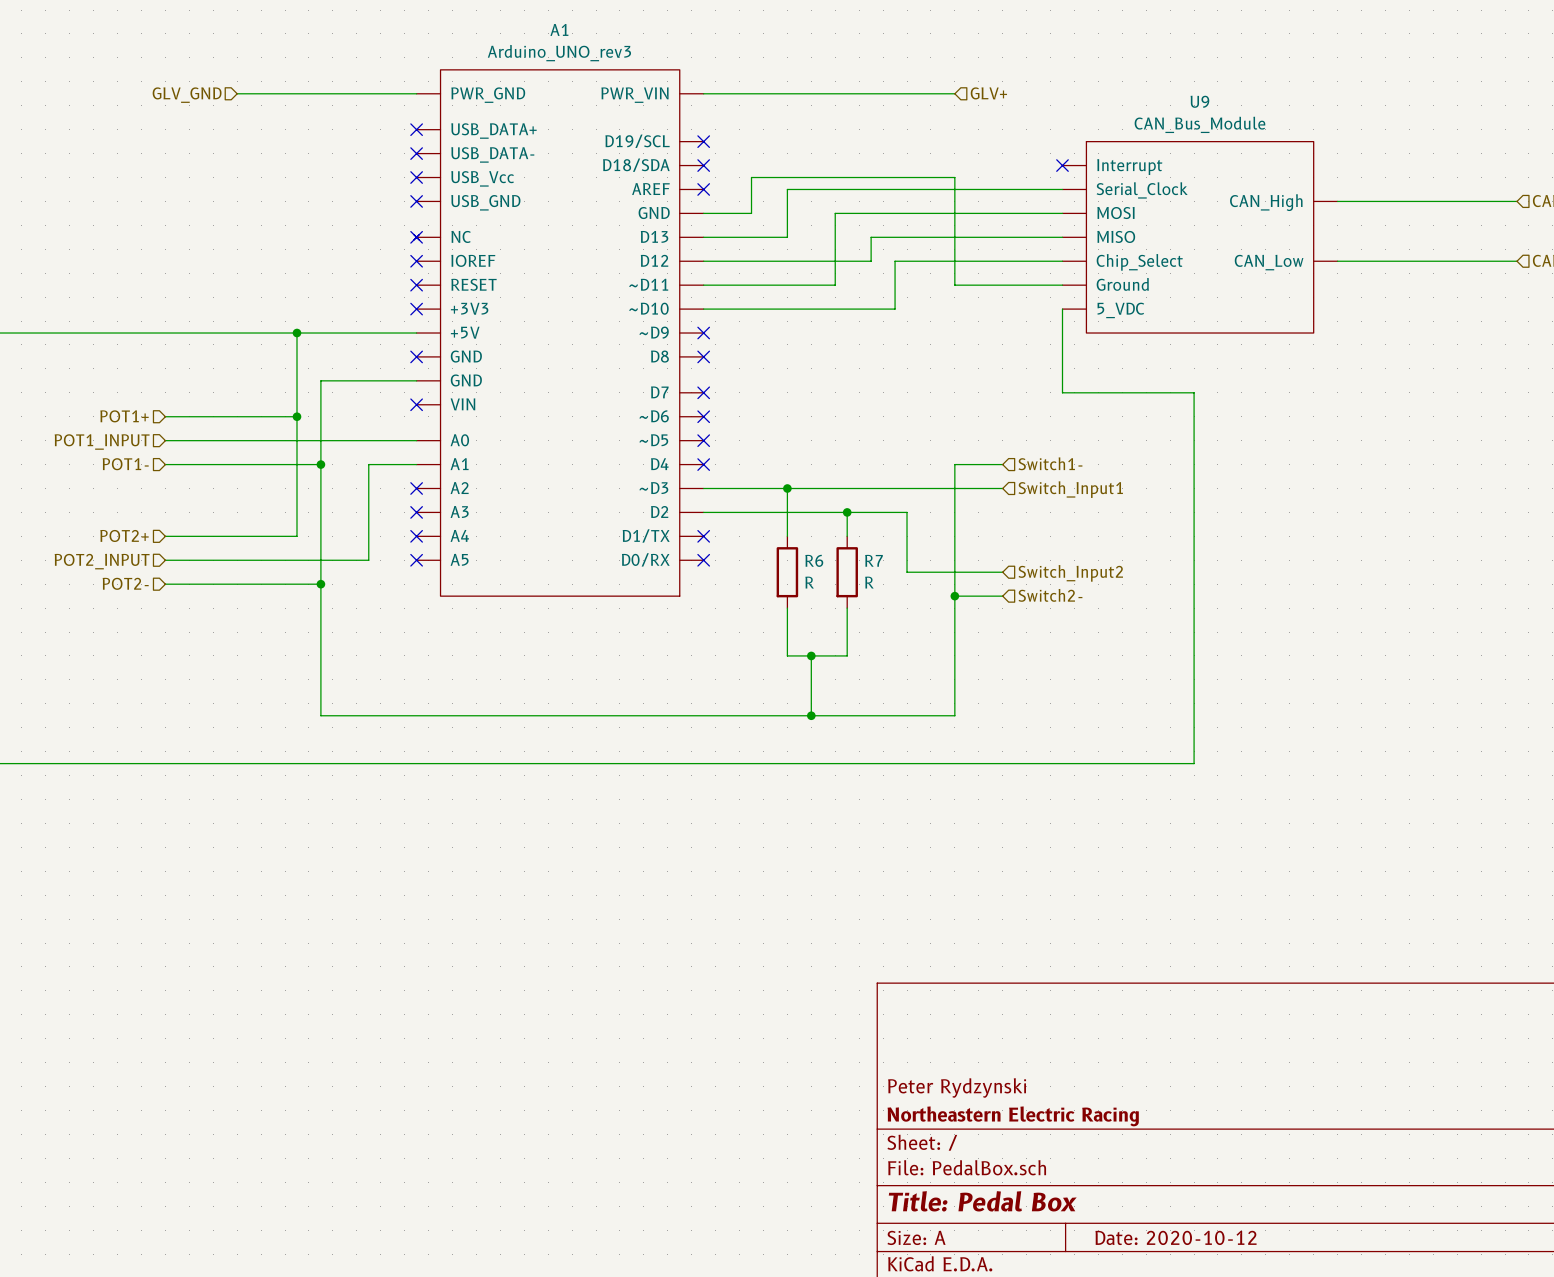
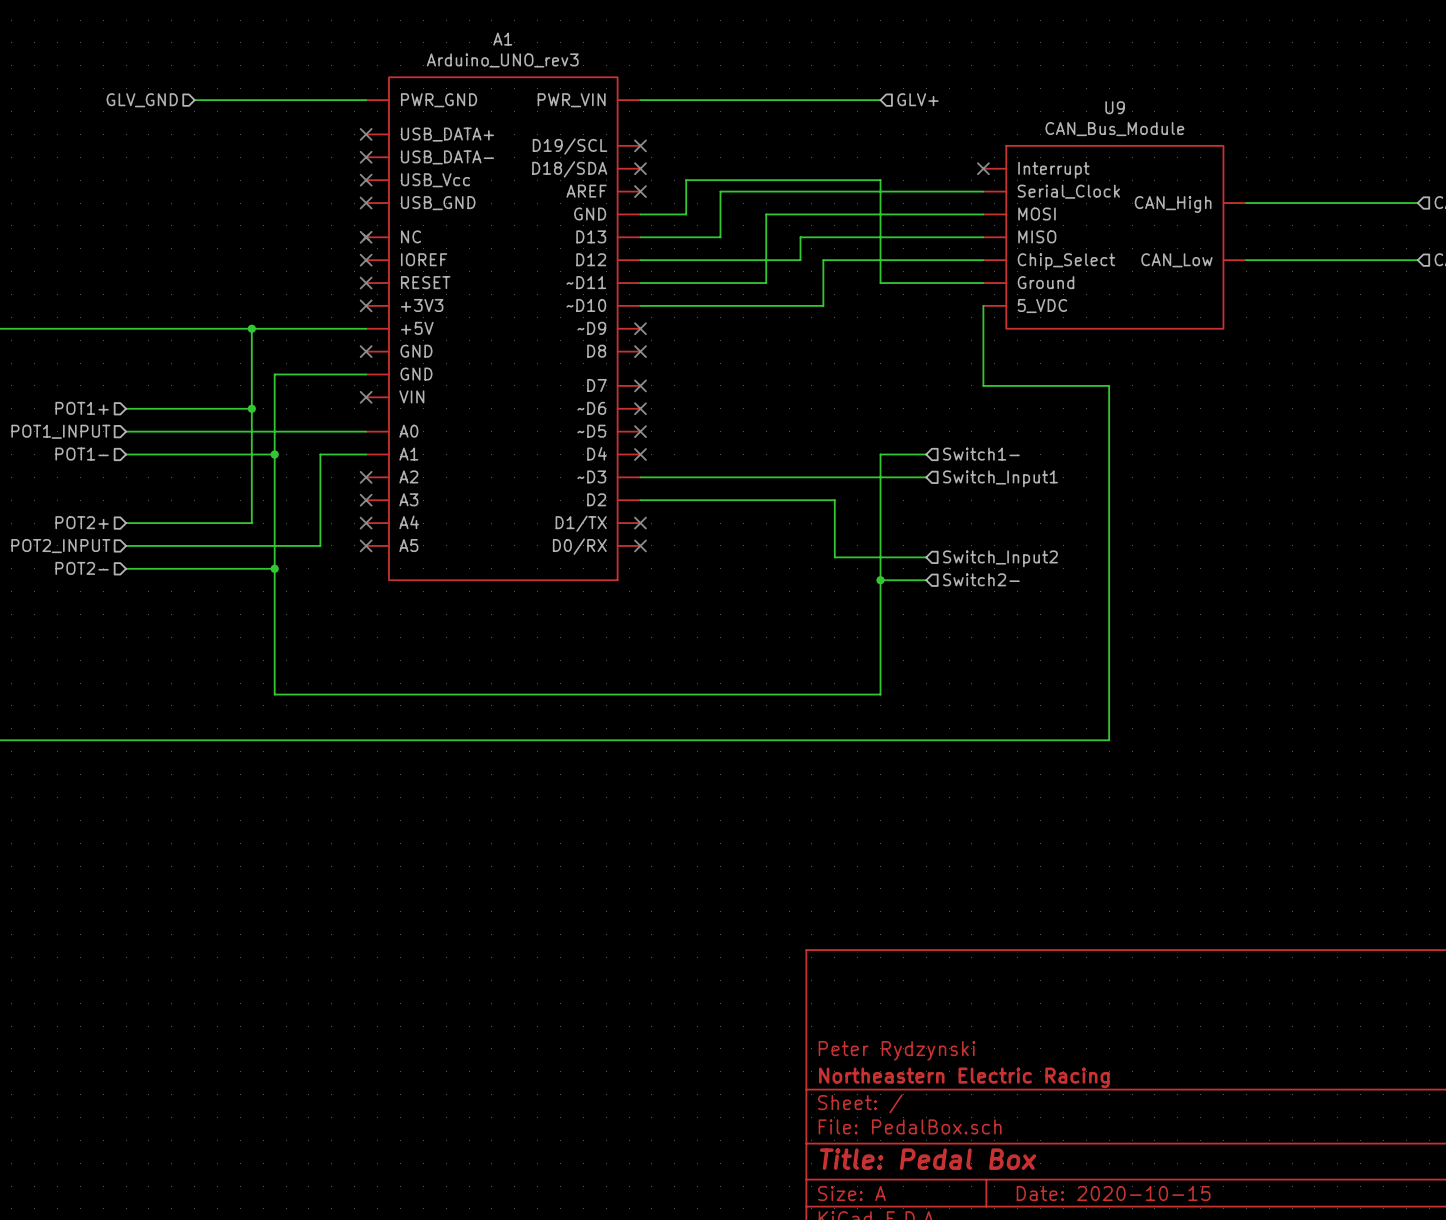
wire: (787, 488) (787, 536) -> none
junction: (787, 488) -> none
wire: (847, 512) (847, 536) -> none
junction: (847, 512) -> none
R6: R (787, 572) -> none
R7: R (847, 572) -> none
wire: (787, 608) (787, 655) (847, 655) (847, 608) -> none
wire: (811, 655) (811, 715) -> none
junction: (811, 655) -> none
junction: (811, 715) -> none
title block: Date: 2020-10-12 (1176, 1237) -> Date: 2020-10-15 (1113, 1193)

